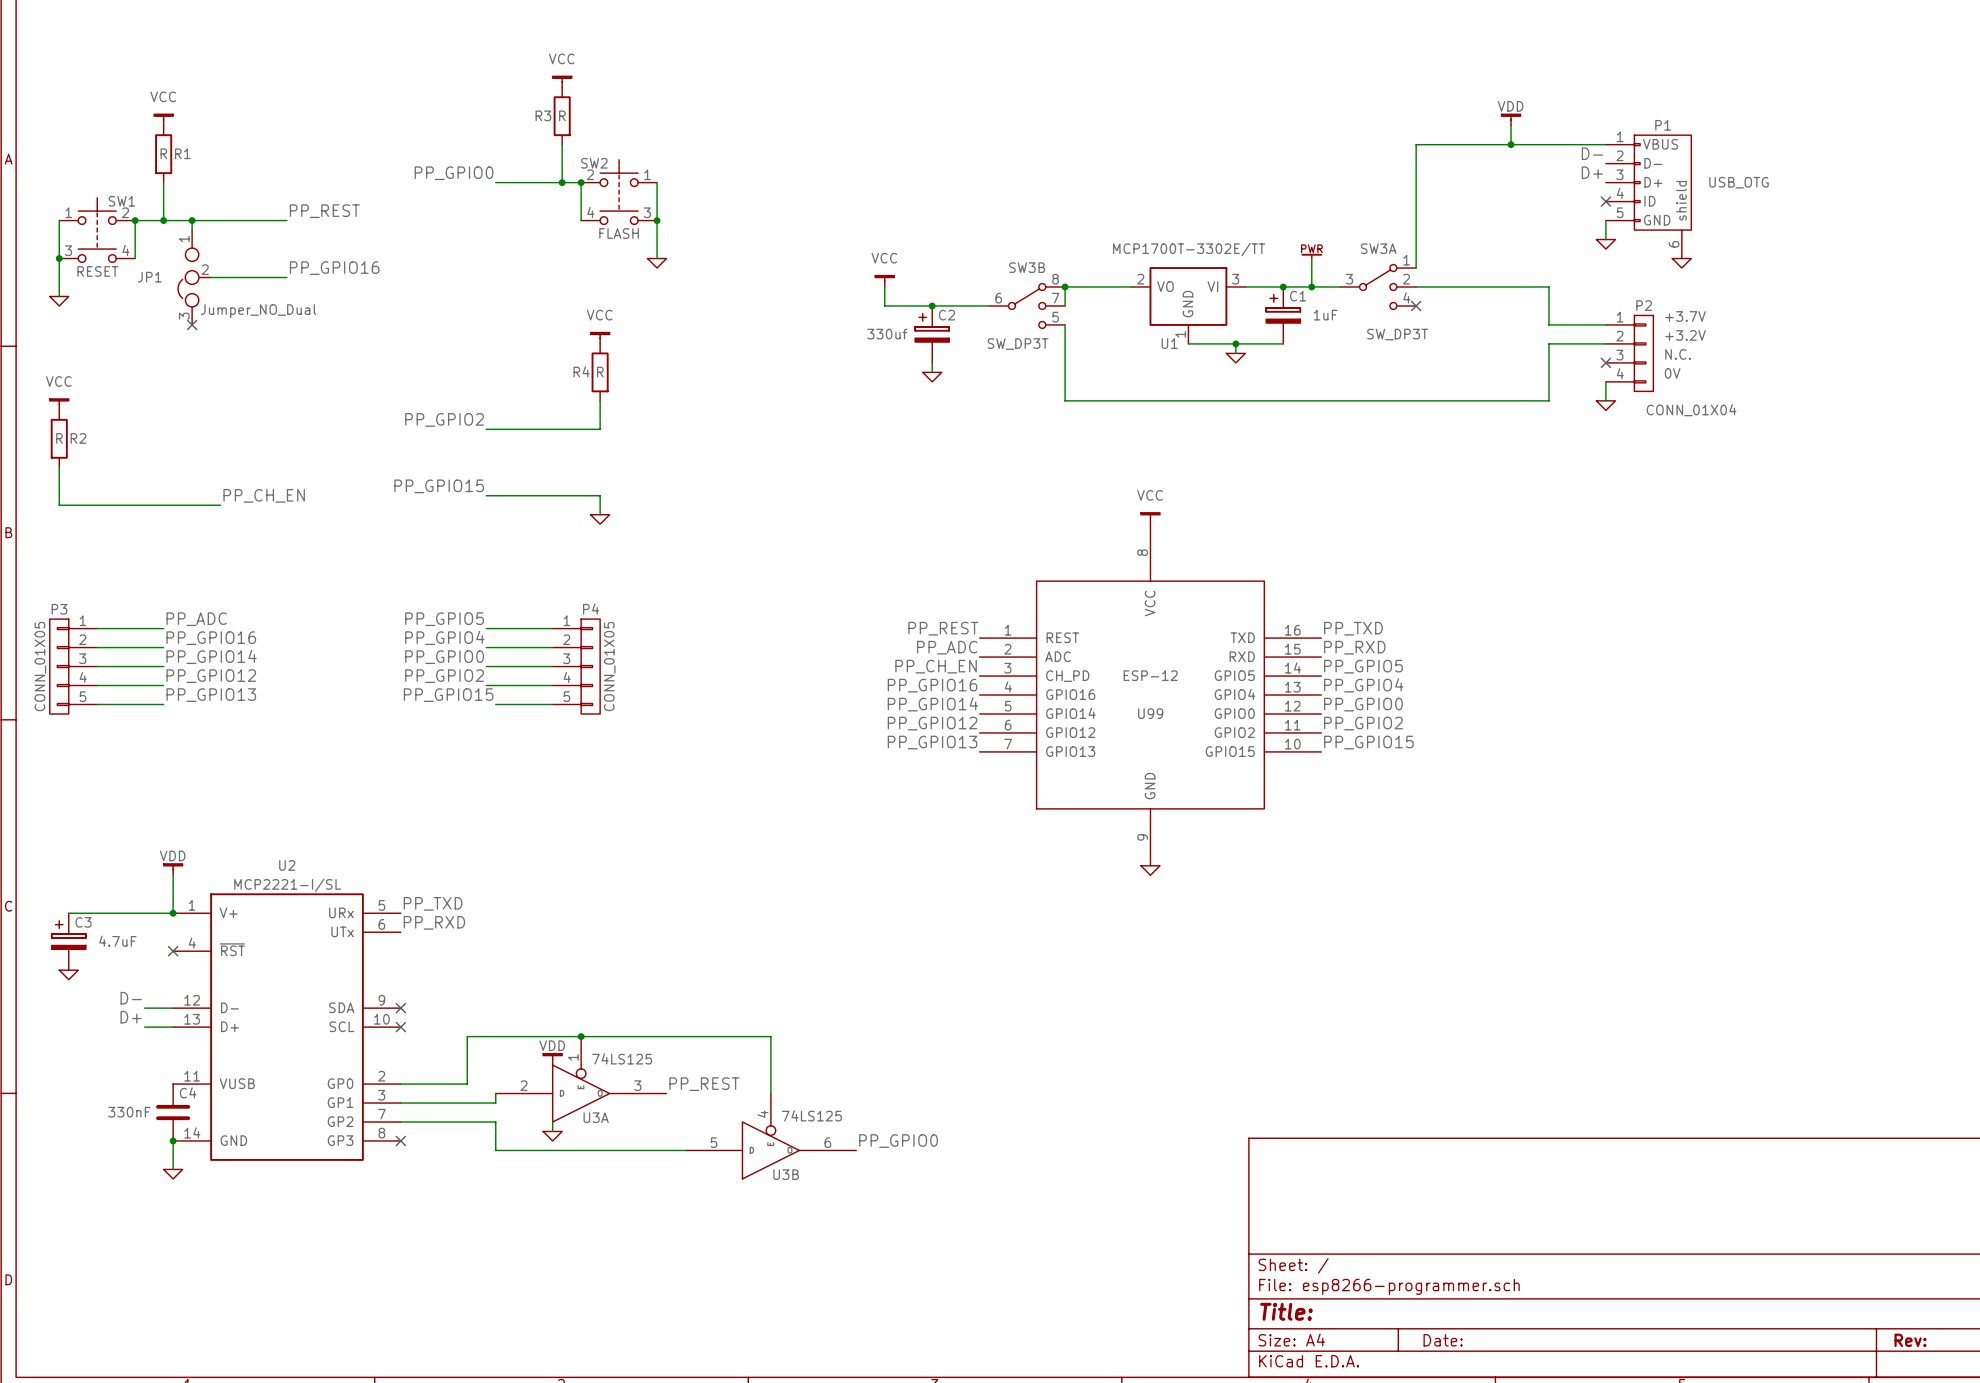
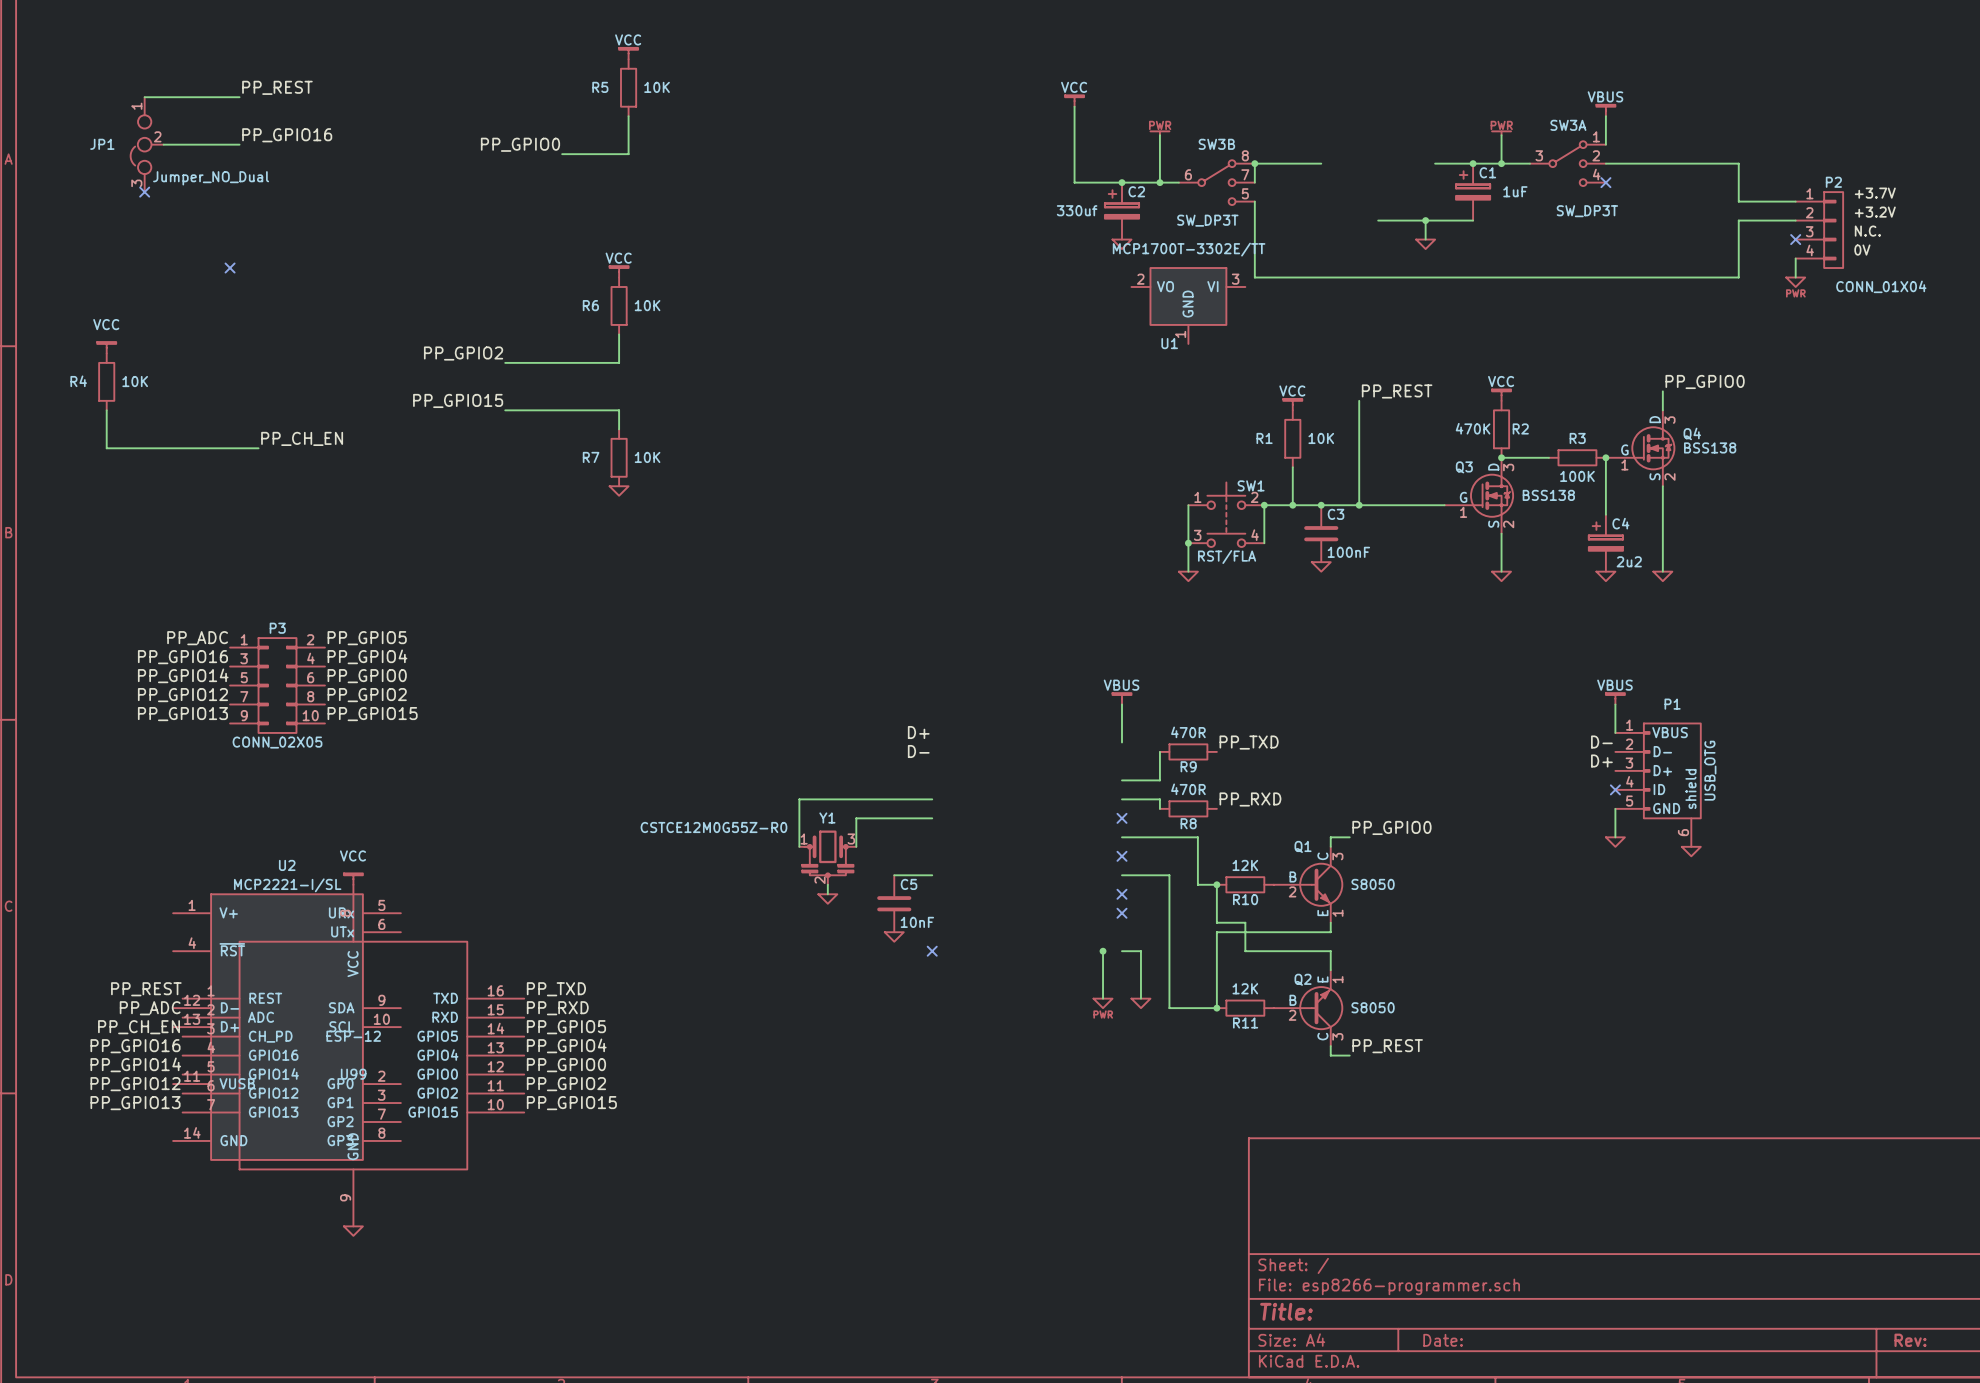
power symbol text position: VCC (561, 58) -> VCC (628, 39)
power symbol position: VCC (562, 82) -> VCC (628, 53)
R5: none -> 10K (628, 87)
wire: none -> (144, 97) (239, 97)
power symbol: none -> VCC (1074, 101)
wire: none -> (1074, 106) (1074, 182) (1178, 182)
power symbol: none -> VBUS (1605, 110)
R3 value: R (562, 115) -> 100K (1577, 476)
R3 rotation: 0° (562, 116) -> 90° clockwise (1577, 457)
R3 position: (562, 116) -> (1577, 457)
wire: none -> (628, 116) (628, 154) (562, 154)
power symbol: VCC (163, 119) -> none
power symbol: VDD (1511, 119) -> none
wire: (1511, 125) (1511, 144) -> (1425, 220) (1425, 239)
P1 name position: P1 (1663, 125) -> P1 (1672, 704)
power symbol: none -> (1159, 132)
power symbol: none -> (1501, 132)
wire: none -> (1159, 135) (1159, 182)
wire: none -> (1501, 135) (1501, 163)
wire: (562, 144) (562, 182) -> none
junction: (1511, 144) -> none
wire: (1605, 144) (1416, 144) (1416, 268) -> (1605, 144) (1605, 116)
R1 value: R (163, 153) -> 10K (1321, 438)
R1 name position: R1 (182, 153) -> R1 (1264, 438)
label: D- (1592, 153) -> none
R1 position: (163, 154) -> (1292, 438)
junction: none -> (1254, 163)
wire: none -> (1321, 163) (1254, 163) (1254, 182)
wire: none -> (1435, 163) (1530, 163)
junction: none -> (1473, 163)
junction: none -> (1501, 163)
wire: none -> (1605, 163) (1738, 163) (1738, 201) (1795, 201)
label: D+ (1592, 172) -> none
label position: PP_GPIO0 (454, 173) -> PP_GPIO0 (520, 144)
wire: (163, 182) (163, 220) -> none
wire: (495, 182) (581, 182) (581, 220) -> none
junction: (562, 182) -> none
junction: (581, 182) -> none
wire: (657, 182) (657, 258) -> none
junction: none -> (1121, 182)
junction: none -> (1159, 182)
P1 value rotation: 0° (1738, 182) -> 90° counterclockwise (1710, 770)
no-connect mark: none -> (144, 192)
SW2: FLASH (619, 192) -> none
label: none -> +3.7V (1875, 193)
P1 position: (1648, 196) -> (1658, 785)
wire: none -> (1254, 201) (1254, 277) (1738, 277) (1738, 220) (1795, 220)
no-connect mark position: (1605, 201) -> (1605, 182)
label position: PP_REST (324, 211) -> PP_REST (277, 87)
label: none -> +3.2V (1875, 212)
wire: (59, 220) (59, 296) -> none
junction: (135, 220) -> none
junction: (163, 220) -> none
wire: (192, 220) (192, 230) -> none
junction: (192, 220) -> none
wire: (286, 220) (135, 220) (135, 258) -> none
junction: (657, 220) -> none
junction: none -> (1425, 220)
wire: (1605, 220) (1605, 239) -> none
SW1 position: (97, 230) -> (1226, 514)
label: none -> N.C. (1867, 231)
no-connect mark: none -> (1795, 239)
power symbol: none -> (1121, 244)
power symbol: none -> (1425, 244)
power symbol: (1605, 244) -> none
label: none -> 0V (1862, 250)
power symbol: (1311, 256) -> none
junction: (59, 258) -> none
wire: (1311, 258) (1311, 286) -> none
wire: none -> (1795, 258) (1795, 277)
power symbol: (657, 263) -> none
power symbol: (1681, 263) -> none
no-connect mark: none -> (230, 268)
label position: PP_GPIO16 (334, 268) -> PP_GPIO16 (287, 135)
SW1 value: RESET (97, 271) -> RST/FLA (1227, 557)
JP1 position: (194, 277) -> (147, 144)
wire: (211, 277) (286, 277) -> (163, 144) (239, 144)
power symbol: VCC (884, 281) -> none
power symbol: none -> (1795, 282)
wire: (884, 286) (884, 305) (989, 305) -> none
junction: (1065, 286) -> none
wire: (1131, 286) (1065, 286) (1065, 305) -> none
wire: (1245, 286) (1340, 286) -> (1378, 220) (1473, 220)
junction: (1283, 286) -> none
junction: (1311, 286) -> none
SW3A position: (1378, 286) -> (1567, 163)
wire: (1416, 286) (1548, 286) (1548, 324) (1605, 324) -> none
power symbol: (59, 301) -> none
R6: none -> 10K (619, 305)
junction: (932, 305) -> none
SW3B position: (1027, 305) -> (1216, 182)
no-connect mark: (1416, 305) -> none
power symbol text position: VCC (599, 315) -> VCC (618, 258)
C1 position: (1283, 315) -> (1473, 192)
label: +3.7V (1685, 316) -> none
no-connect mark: (192, 324) -> none
wire: (1065, 324) (1065, 400) (1548, 400) (1548, 343) (1605, 343) -> none
C2 position: (932, 334) -> (1121, 211)
label: +3.2V (1685, 335) -> none
power symbol position: VCC (600, 338) -> VCC (619, 271)
wire: (1188, 343) (1283, 343) -> none
wire: (1235, 343) (1235, 353) -> none
junction: (1235, 343) -> none
P2 position: (1629, 353) -> (1819, 230)
label: N.C. (1678, 354) -> none
power symbol: (1235, 358) -> none
wire: (932, 362) (932, 372) -> none
no-connect mark: (1605, 362) -> none
R4 name position: R4 (581, 371) -> R4 (78, 381)
R4 position: (600, 372) -> (106, 381)
R4 value: R (600, 372) -> 10K (135, 381)
label: 0V (1672, 373) -> none
power symbol: (932, 377) -> none
wire: (1605, 381) (1605, 400) -> (1662, 391) (1662, 410)
label: none -> PP_GPIO0 (1705, 381)
label: none -> PP_REST (1397, 391)
power symbol: none -> VCC (1501, 395)
wire: (600, 400) (600, 429) (486, 429) -> (619, 334) (619, 362) (505, 362)
wire: none -> (1359, 400) (1359, 505)
power symbol position: VCC (59, 404) -> VCC (106, 347)
power symbol: (1605, 405) -> none
wire: none -> (106, 410) (106, 448) (258, 448)
label position: PP_GPIO2 (444, 419) -> PP_GPIO2 (463, 353)
R2 position: (59, 438) -> (1501, 429)
R2 value: R (59, 438) -> 470K (1473, 428)
Q4: none -> BSS138 (1640, 448)
R7: none -> 10K (619, 457)
wire: none -> (1501, 457) (1548, 457)
junction: none -> (1501, 457)
wire: none -> (1605, 457) (1605, 514)
junction: none -> (1605, 457)
wire: (59, 467) (59, 505) (220, 505) -> none
wire: none -> (1292, 467) (1292, 505)
label position: PP_GPIO15 (439, 486) -> PP_GPIO15 (458, 400)
wire: none -> (1662, 486) (1662, 571)
label position: PP_CH_EN (264, 495) -> PP_CH_EN (302, 438)
wire: (486, 495) (600, 495) (600, 514) -> (505, 410) (619, 410) (619, 429)
power symbol text position: VCC (1150, 495) -> VCC (1292, 391)
Q3: none -> BSS138 (1479, 495)
wire: none -> (1188, 505) (1188, 571)
junction: none -> (1264, 505)
junction: none -> (1292, 505)
junction: none -> (1321, 505)
junction: none -> (1359, 505)
wire: none -> (1444, 505) (1264, 505) (1264, 543)
power symbol position: VCC (1150, 518) -> VCC (1292, 404)
power symbol position: (600, 519) -> (619, 491)
wire: none -> (1501, 533) (1501, 571)
junction: none -> (1188, 543)
power symbol: none -> (1321, 566)
power symbol: none -> (1188, 576)
power symbol: none -> (1501, 576)
power symbol: none -> (1605, 576)
power symbol: none -> (1662, 576)
P3 symbol: [49, 619, 98, 714] -> [230, 638, 325, 733]
label position: PP_ADC (196, 619) -> PP_ADC (197, 638)
label position: PP_GPIO5 (444, 619) -> PP_GPIO5 (367, 638)
wire: (97, 628) (163, 628) -> none
wire: (486, 628) (552, 628) -> none
label: PP_REST (943, 628) -> none
label position: PP_TXD (1353, 628) -> PP_TXD (1249, 742)
label position: PP_GPIO4 (444, 637) -> PP_GPIO4 (367, 656)
label position: PP_GPIO16 (211, 638) -> PP_GPIO16 (182, 657)
wire: (97, 647) (163, 647) -> none
wire: (486, 647) (552, 647) -> none
label: PP_ADC (947, 647) -> none
label position: PP_RXD (1354, 647) -> PP_RXD (1250, 799)
label position: PP_GPIO14 (211, 656) -> PP_GPIO14 (183, 675)
label position: PP_GPIO0 (444, 657) -> PP_GPIO0 (367, 676)
P3 value: CONN_01X05 (40, 666) -> CONN_02X05 (277, 742)
wire: (97, 666) (163, 666) -> none
wire: (486, 666) (552, 666) -> none
P4: CONN_01X05 (576, 666) -> none
label: PP_CH_EN (936, 666) -> none
label: PP_GPIO5 (1363, 666) -> none
label position: PP_GPIO12 (211, 676) -> PP_GPIO12 (182, 695)
label: PP_GPIO2 (444, 676) -> none
wire: (97, 685) (163, 685) -> none
wire: (486, 685) (552, 685) -> none
label: PP_GPIO16 (932, 685) -> none
label: PP_GPIO4 (1363, 685) -> none
label position: PP_GPIO13 (211, 695) -> PP_GPIO13 (182, 714)
label: none -> PP_GPIO2 (367, 695)
label: PP_GPIO15 (448, 695) -> none
U99 position: (1150, 695) -> (353, 1055)
power symbol: none -> VBUS (1121, 698)
power symbol: none -> VBUS (1615, 698)
wire: (97, 704) (163, 704) -> none
wire: (495, 704) (552, 704) -> none
label: PP_GPIO14 (932, 704) -> none
wire: none -> (1121, 704) (1121, 742)
label position: PP_GPIO0 (1363, 704) -> PP_GPIO0 (1391, 827)
wire: none -> (1615, 704) (1615, 732)
label: none -> PP_GPIO15 (372, 714)
label: PP_GPIO12 (932, 723) -> none
label: PP_GPIO2 (1363, 723) -> none
label: none -> D+ (918, 732)
label: PP_GPIO13 (932, 742) -> none
label: PP_GPIO15 (1368, 742) -> none
label: none -> D- (1601, 742)
label: none -> D- (918, 751)
wire: none -> (1159, 751) (1159, 780) (1121, 780)
R9: none -> 470R (1188, 751)
label: none -> D+ (1601, 760)
no-connect mark: none -> (1615, 789)
wire: none -> (932, 799) (799, 799) (799, 846)
wire: none -> (1121, 799) (1159, 799) (1159, 808)
R8: none -> 470R (1188, 808)
wire: none -> (1615, 808) (1615, 837)
wire: none -> (932, 818) (856, 818) (856, 846)
no-connect mark: none -> (1121, 818)
wire: none -> (1121, 837) (1197, 837) (1197, 884) (1216, 884) (1216, 922) (1245, 922) (1245, 951) (1330, 951) (1330, 970)
wire: none -> (1349, 837) (1330, 837) (1330, 846)
power symbol: none -> (1615, 842)
power symbol: none -> (1691, 851)
no-connect mark: none -> (1121, 856)
Y1: none -> CSTCE12M0G55Z-R0 (827, 857)
power symbol: VDD (173, 869) -> none
power symbol: (1150, 870) -> none
wire: (173, 875) (173, 913) (68, 913) -> none
wire: none -> (894, 875) (932, 875)
wire: none -> (1121, 875) (1169, 875) (1169, 1008) (1216, 1008) (1216, 932) (1330, 932) (1330, 922)
power symbol: none -> VCC (353, 879)
wire: none -> (827, 884) (827, 894)
junction: none -> (1216, 884)
R10: none -> 12K (1245, 884)
Q1: none -> S8050 (1308, 884)
no-connect mark: none -> (1121, 894)
power symbol: none -> (827, 899)
label position: PP_TXD (433, 903) -> PP_TXD (556, 989)
C5: none -> 10nF (894, 903)
C3 symbol: [51, 913, 86, 971] -> [1304, 505, 1339, 563]
junction: (173, 913) -> none
no-connect mark: none -> (1121, 913)
label position: PP_RXD (434, 922) -> PP_RXD (557, 1008)
power symbol: none -> (894, 936)
C3 value: 4.7uF (117, 941) -> 100nF (1348, 552)
no-connect mark: (173, 951) -> none
no-connect mark: none -> (932, 951)
wire: none -> (1103, 951) (1103, 998)
junction: none -> (1103, 951)
wire: none -> (1121, 951) (1140, 951) (1140, 998)
power symbol: (68, 974) -> none
label: none -> PP_REST (146, 989)
label: D- (131, 998) -> none
power symbol: none -> (1103, 1003)
power symbol: none -> (1140, 1003)
wire: (144, 1008) (173, 1008) -> none
label: none -> PP_ADC (150, 1008)
no-connect mark: (400, 1008) -> none
junction: none -> (1216, 1008)
R11: none -> 12K (1245, 1008)
Q2: none -> S8050 (1308, 1008)
label: D+ (131, 1017) -> none
label: none -> PP_CH_EN (139, 1027)
wire: (144, 1027) (173, 1027) -> none
no-connect mark: (400, 1027) -> none
label: none -> PP_GPIO5 (566, 1027)
junction: (581, 1036) -> none
label: none -> PP_GPIO4 (566, 1045)
label: none -> PP_GPIO16 (135, 1046)
wire: none -> (1330, 1046) (1330, 1055) (1349, 1055)
label: none -> PP_REST (1387, 1046)
power symbol: VDD (552, 1059) -> none
label: none -> PP_GPIO14 (135, 1064)
label: none -> PP_GPIO0 (566, 1065)
U3A: 74LS125 (581, 1079) -> none
label: none -> PP_GPIO12 (135, 1084)
C4 symbol: [156, 1084, 191, 1141] -> [1588, 514, 1624, 572]
wire: (400, 1084) (467, 1084) (467, 1036) (770, 1036) (770, 1093) -> none
label: none -> PP_GPIO2 (566, 1084)
label: PP_REST (704, 1084) -> none
wire: (495, 1093) (495, 1103) (400, 1103) -> none
label: none -> PP_GPIO13 (135, 1103)
label: none -> PP_GPIO15 (571, 1103)
C4 value: 330nF (129, 1112) -> 2u2 (1629, 561)
wire: (400, 1121) (495, 1121) (495, 1150) (685, 1150) -> none
wire: (552, 1121) (552, 1131) -> none
power symbol: (552, 1136) -> none
U3B: 74LS125 (770, 1136) -> none
wire: (173, 1140) (173, 1169) -> none
junction: (173, 1140) -> none
no-connect mark: (400, 1140) -> none
label: PP_GPIO0 (898, 1141) -> none
power symbol: (173, 1174) -> none
power symbol: none -> (353, 1231)

